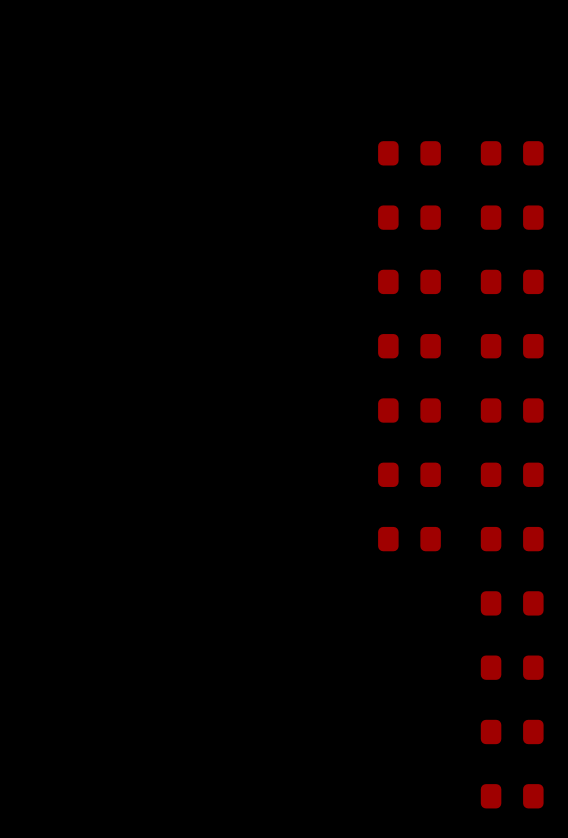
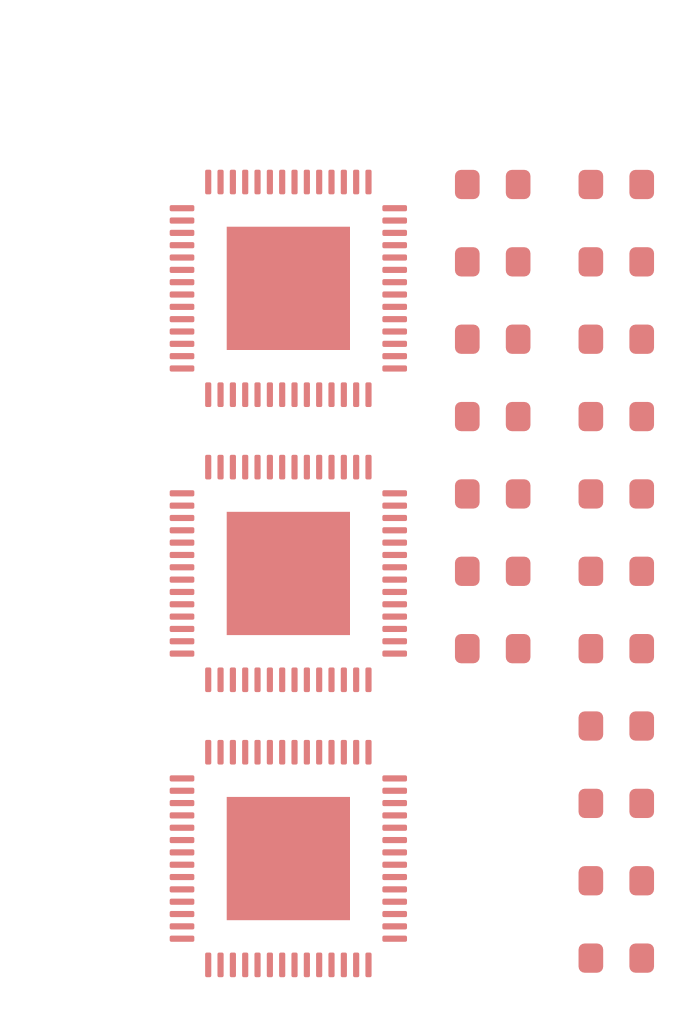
part: none -> (288, 288)
part: none -> (288, 573)
part: none -> (288, 858)

